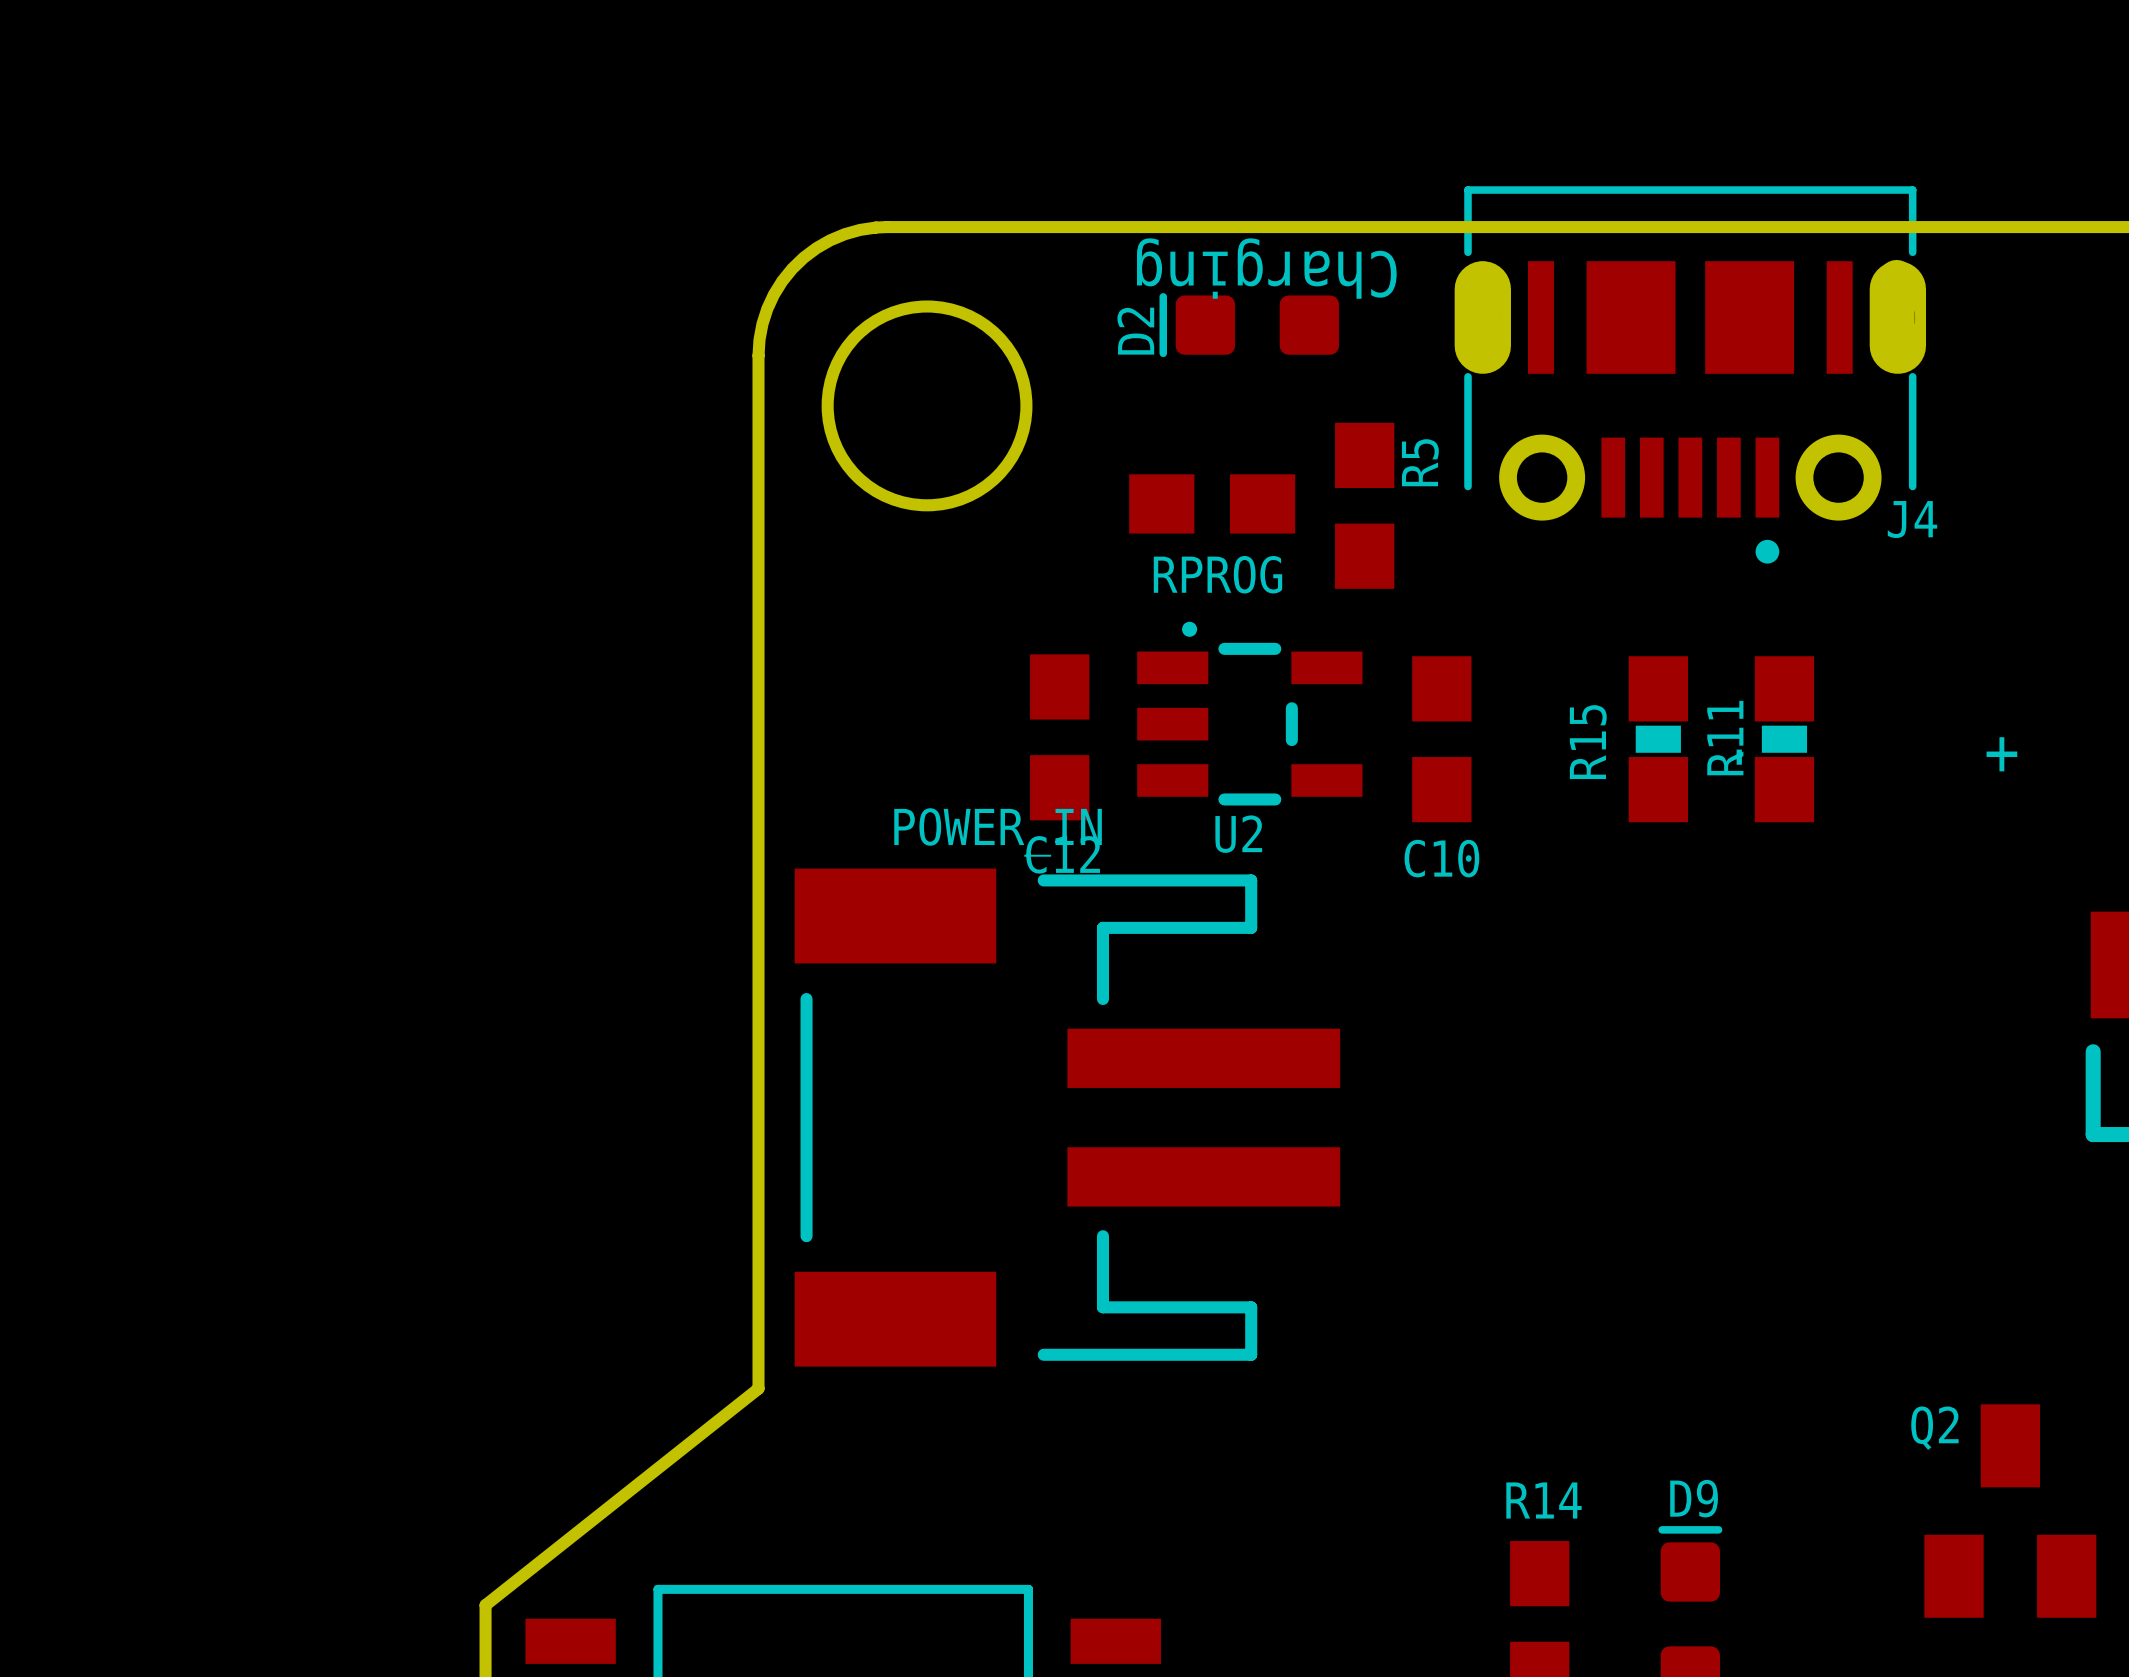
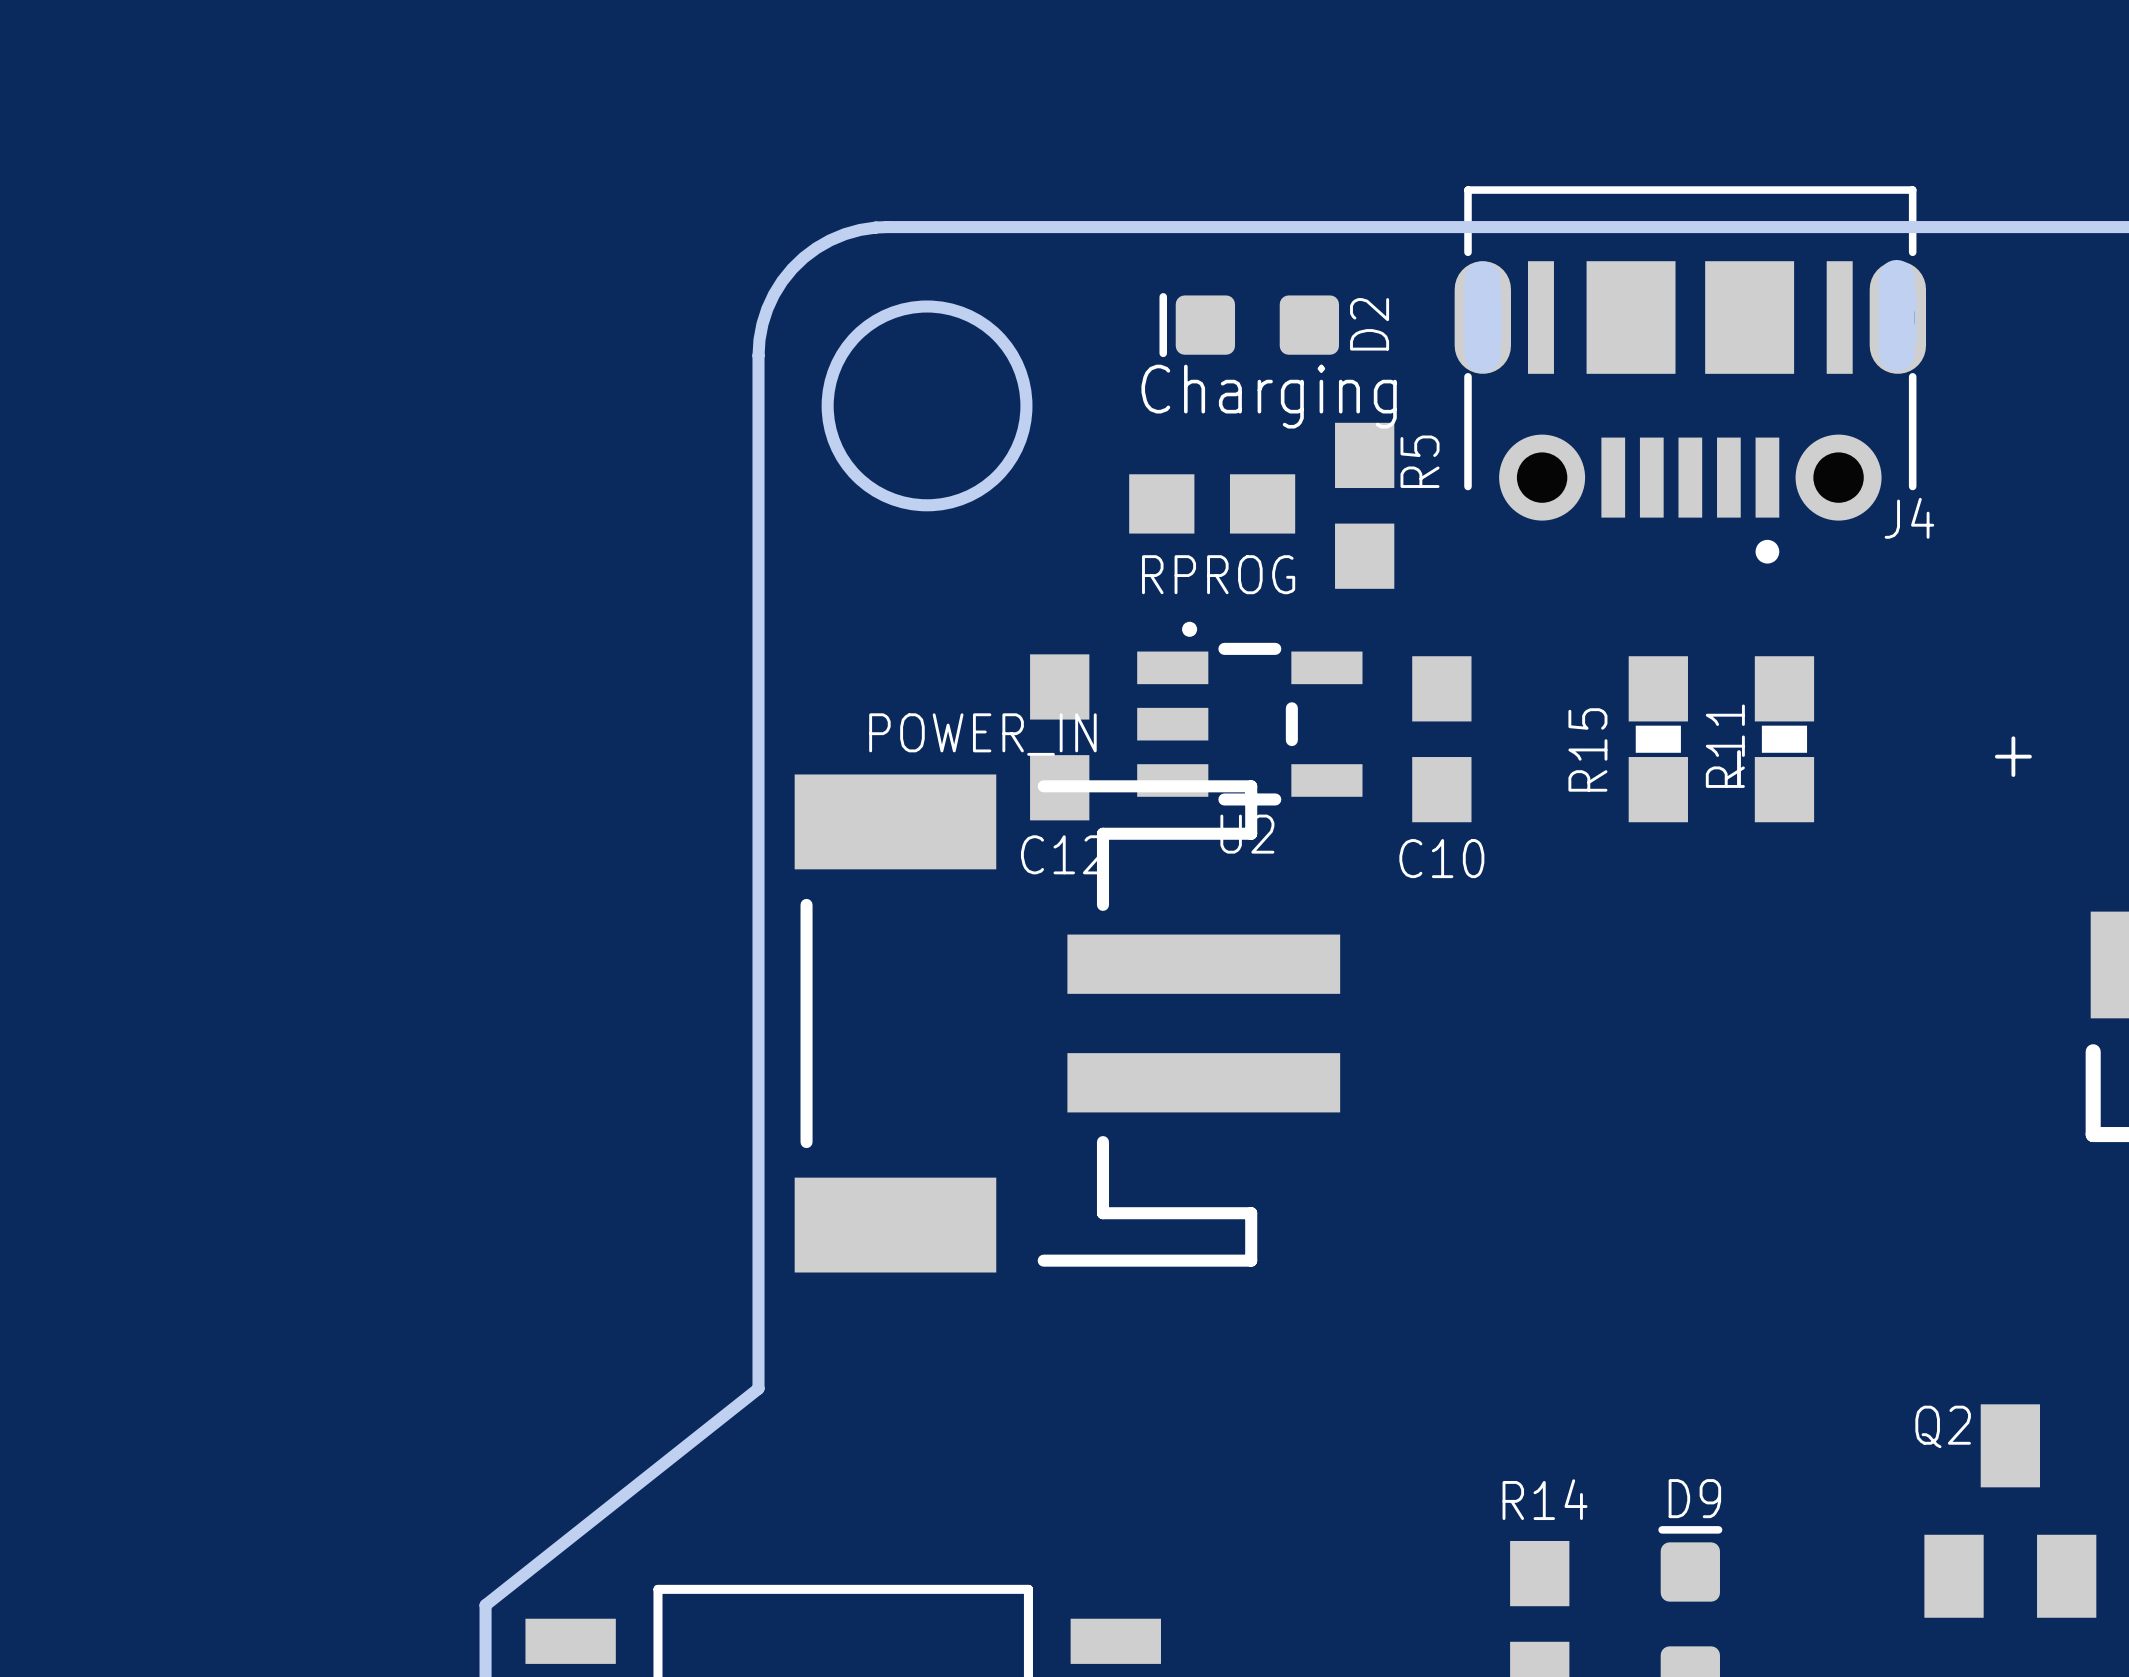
text rotation: 0° (1266, 268) -> 180° (1269, 396)
D2 name position: D2 (1135, 331) -> D2 (1369, 324)
POWER_IN position: (1067, 1117) -> (1067, 1023)

